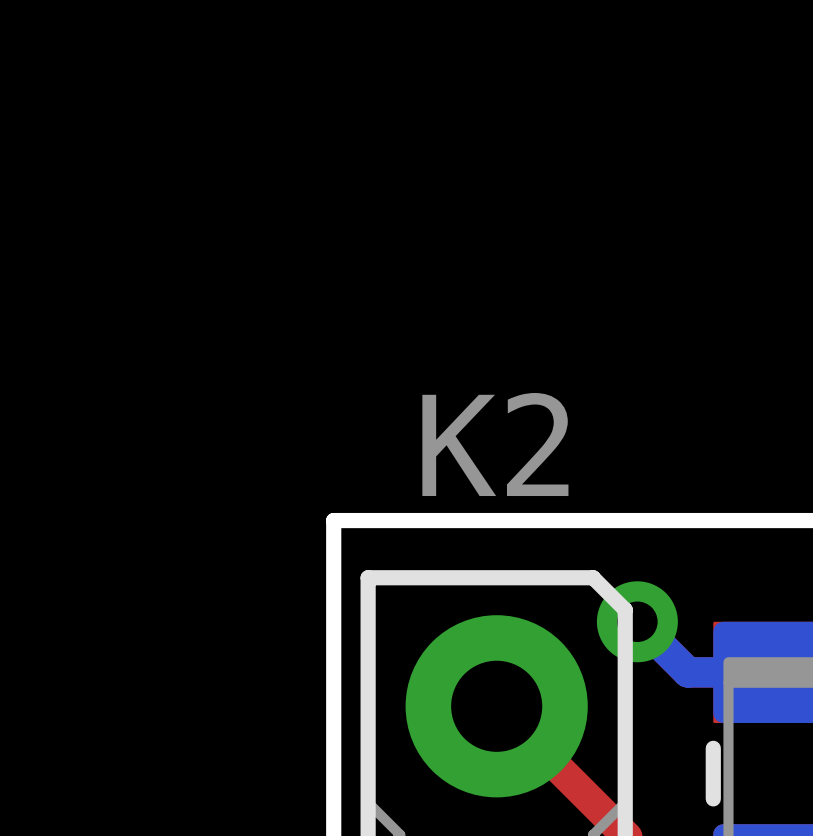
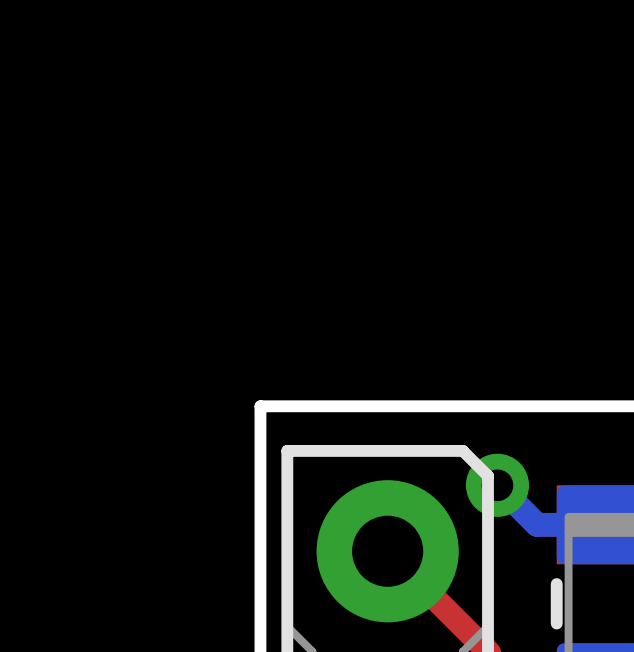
K2 name: K2 (495, 444) -> none

